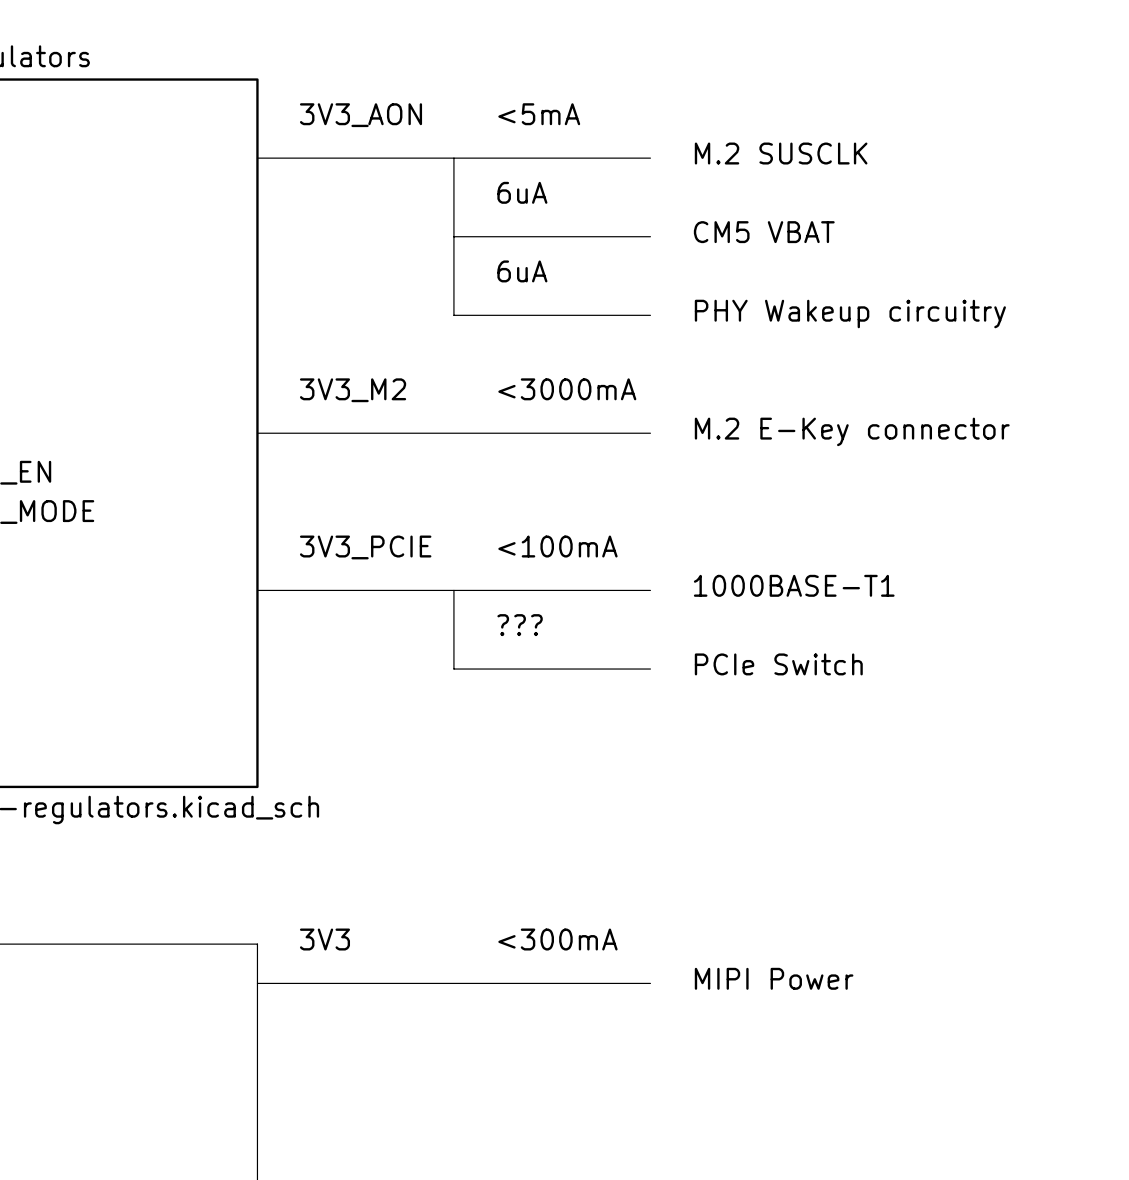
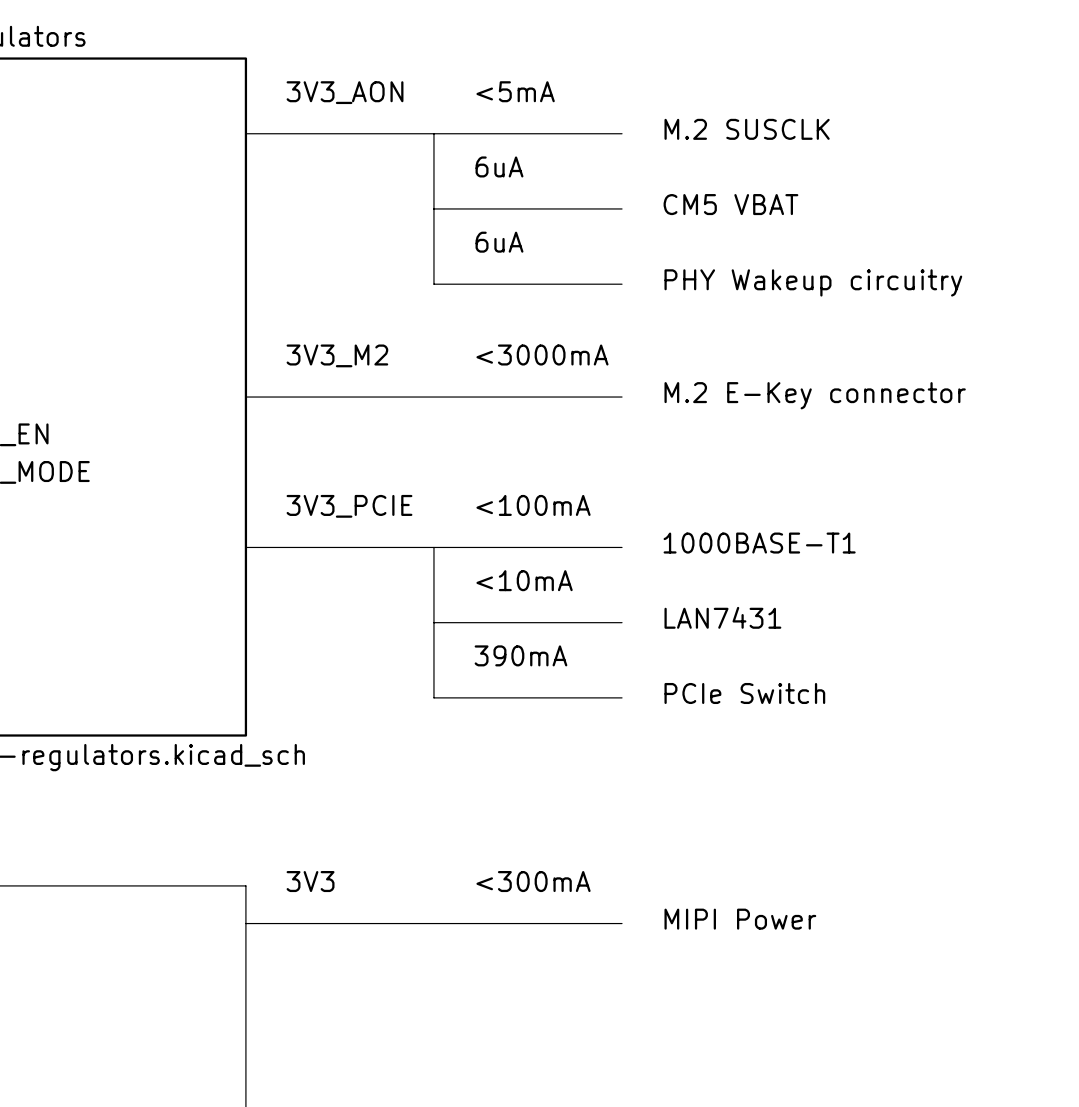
text: ??? (520, 625) -> <10mA (524, 580)
text: PCIe Switch (778, 664) -> LAN7431 (722, 617)
line: none -> (433, 622) (433, 697) (622, 697)
text: none -> 390mA (520, 655)
text: none -> PCIe Switch (744, 693)

